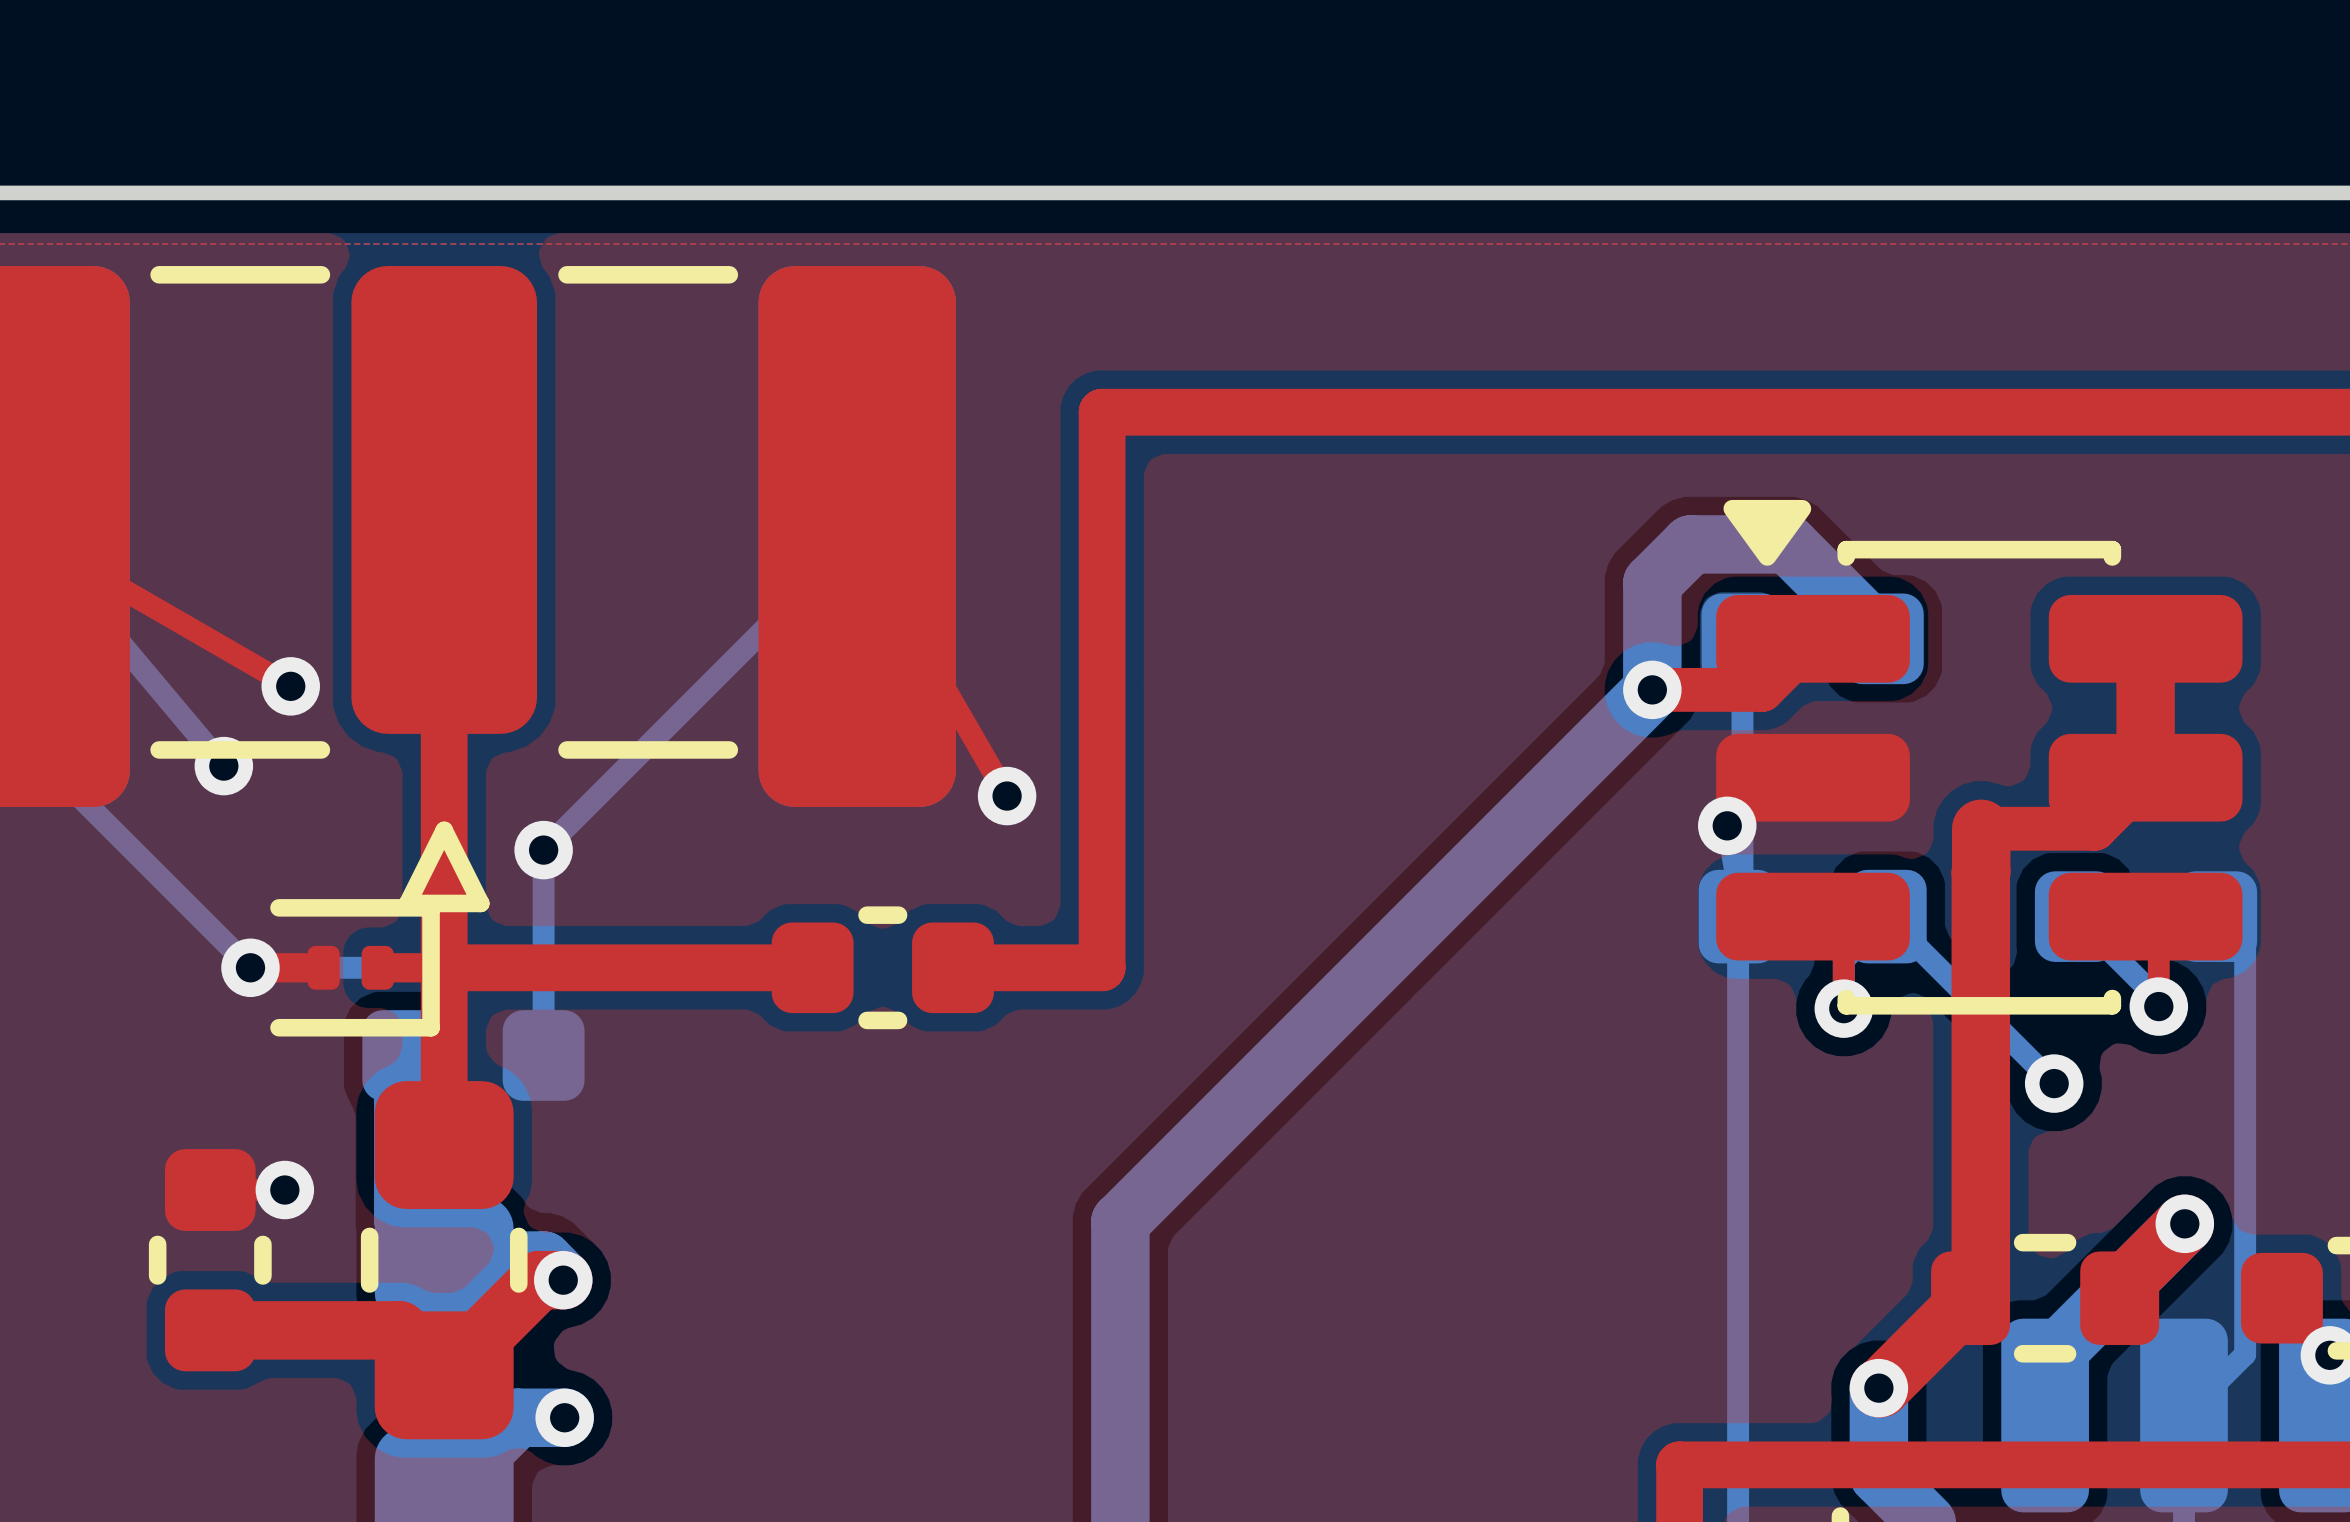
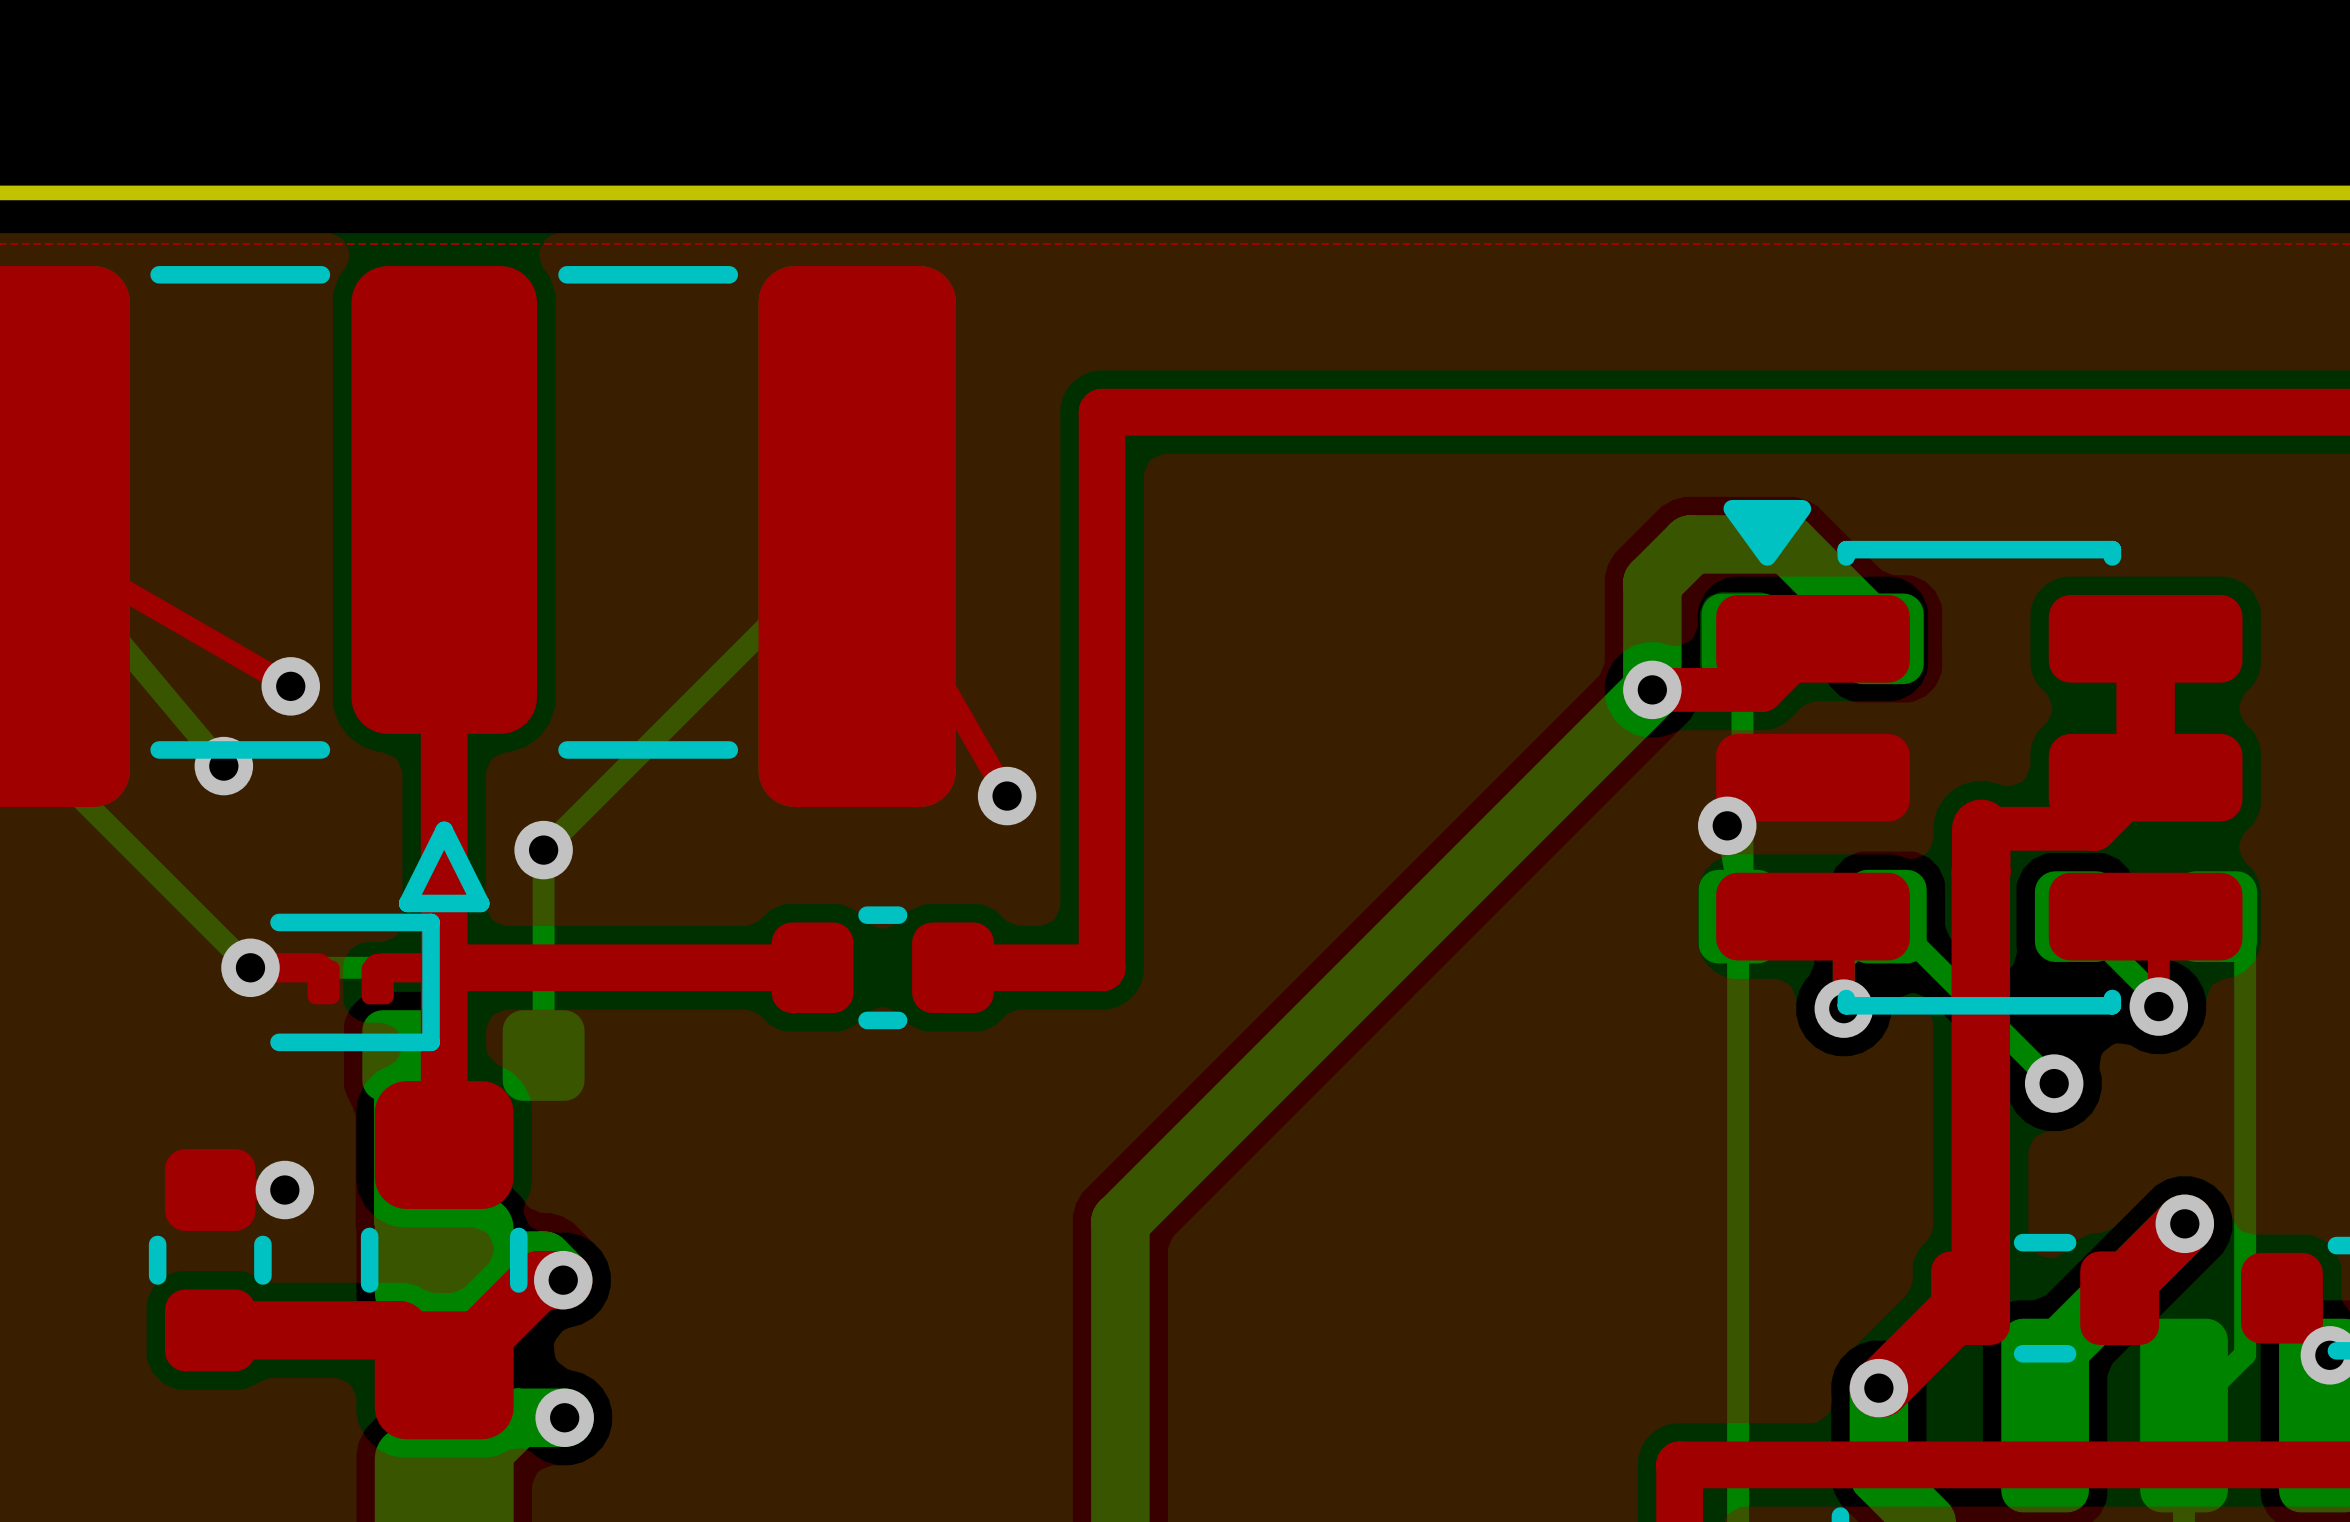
part position: (355, 967) -> (355, 982)

